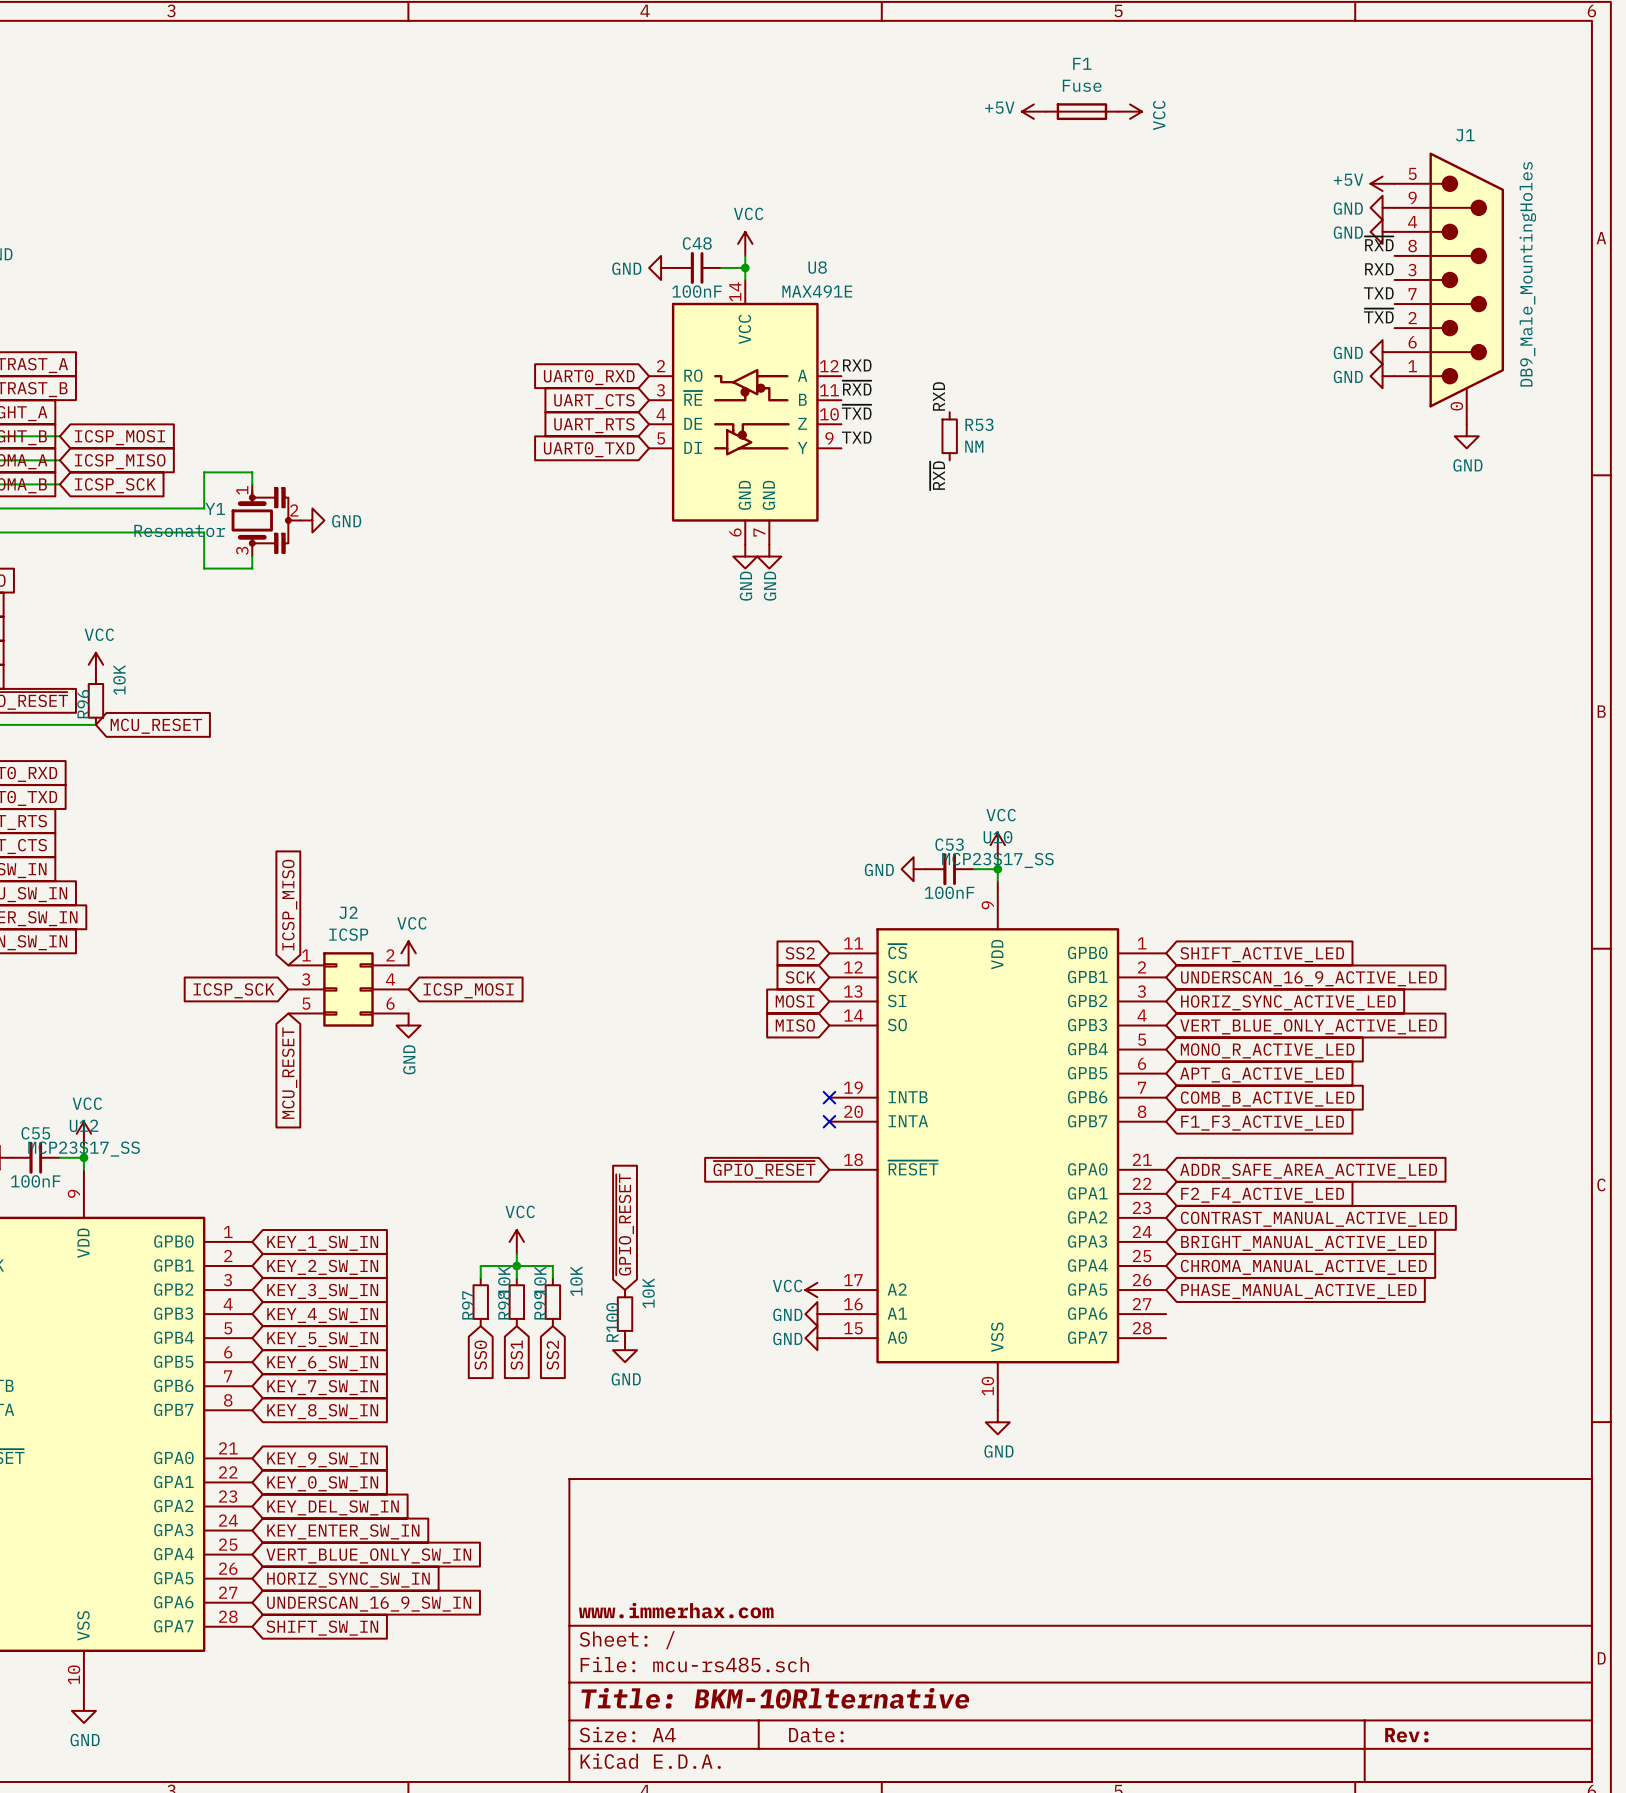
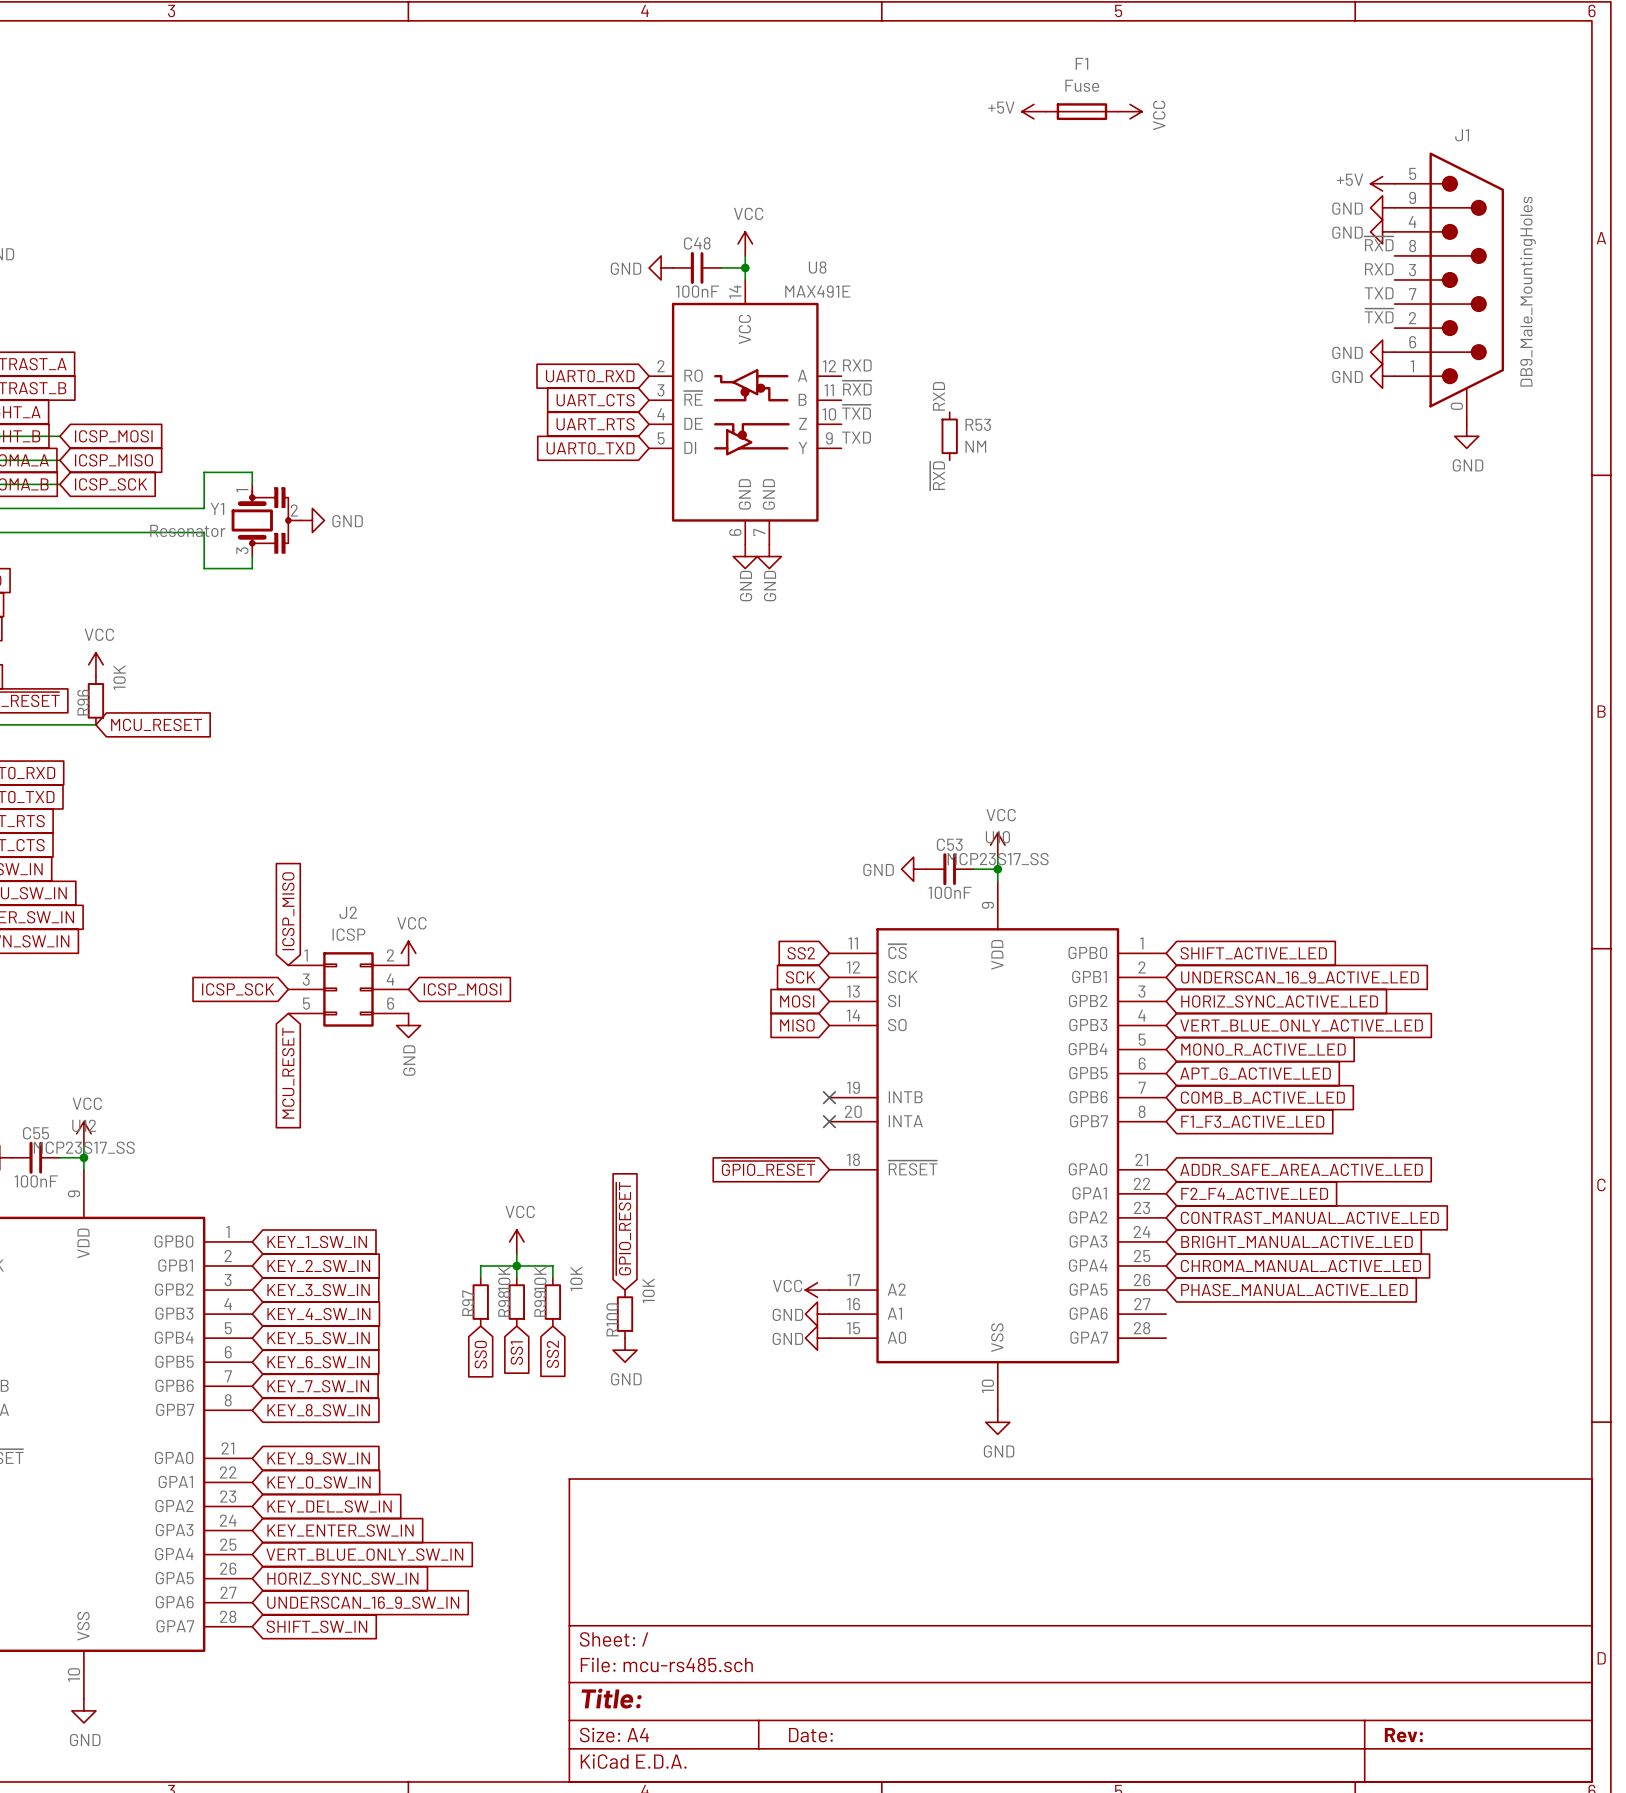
title block: www.immerhax.com (676, 1610) -> none
title block: Title: BKM-10Rlternative (775, 1698) -> Title: (611, 1698)

